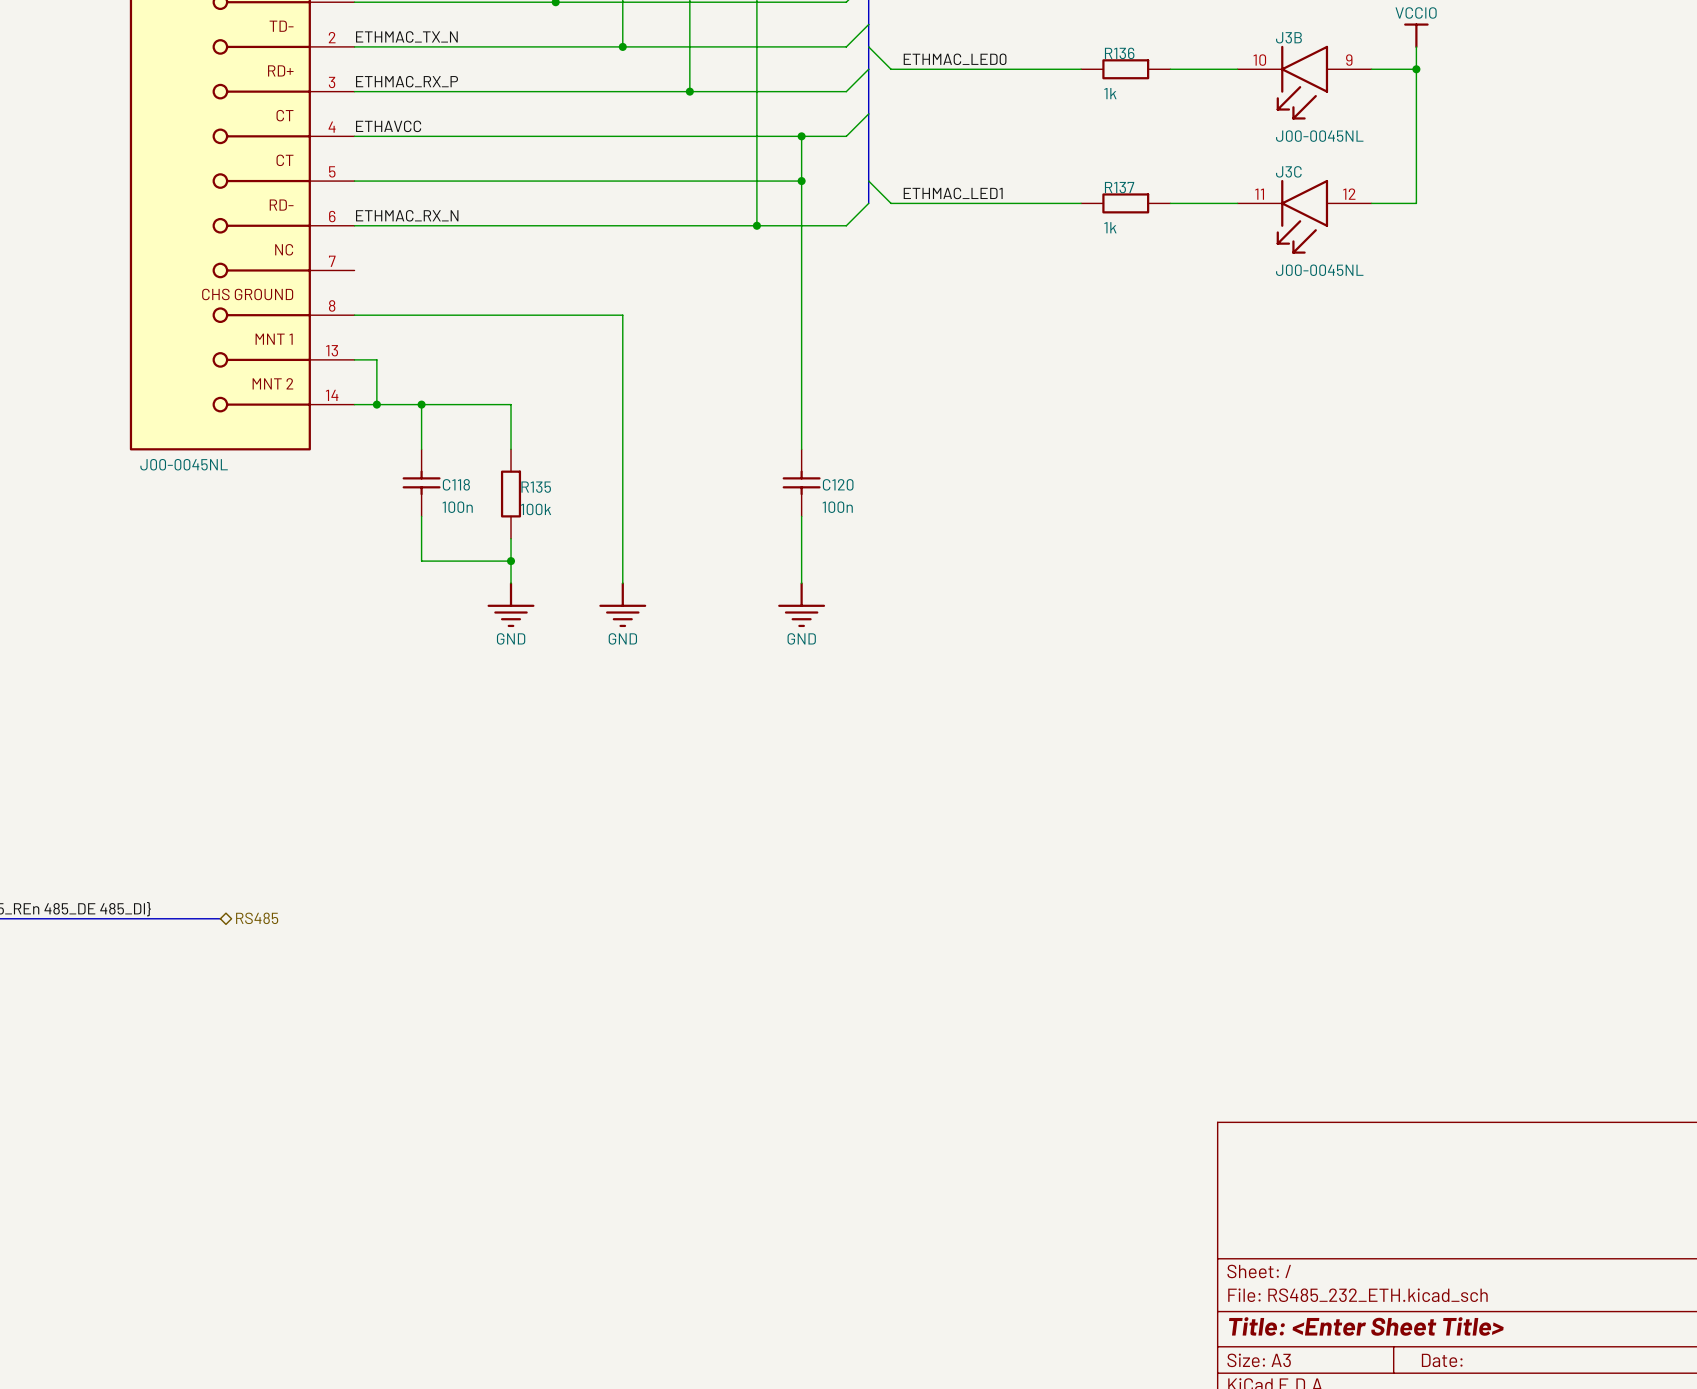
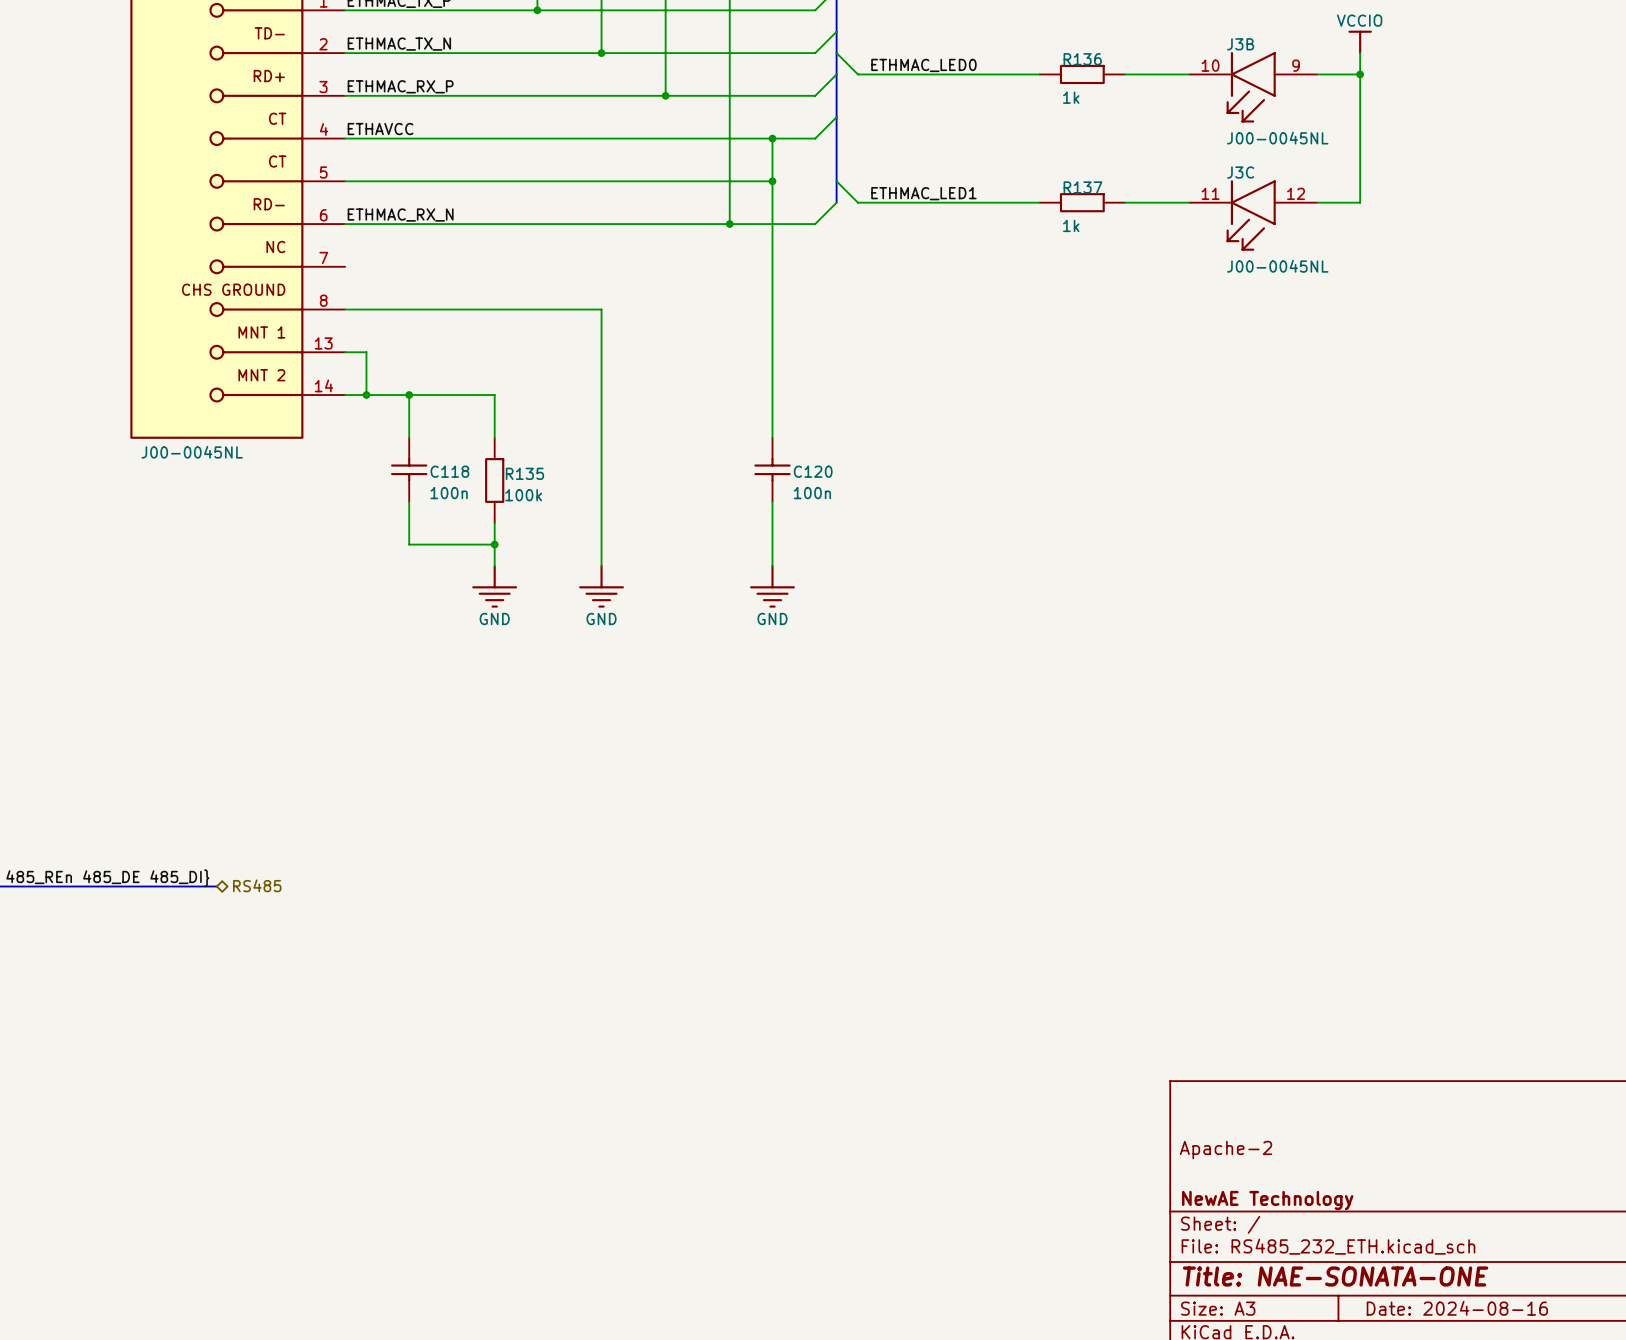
title block: none -> Apache-2 (1226, 1150)
title block: none -> NewAE Technology (1267, 1200)
title block: Title: <Enter Sheet Title> (1366, 1326) -> Title: NAE-SONATA-ONE (1335, 1276)
title block: Date: (1442, 1360) -> Date: 2024-08-16 (1457, 1308)

